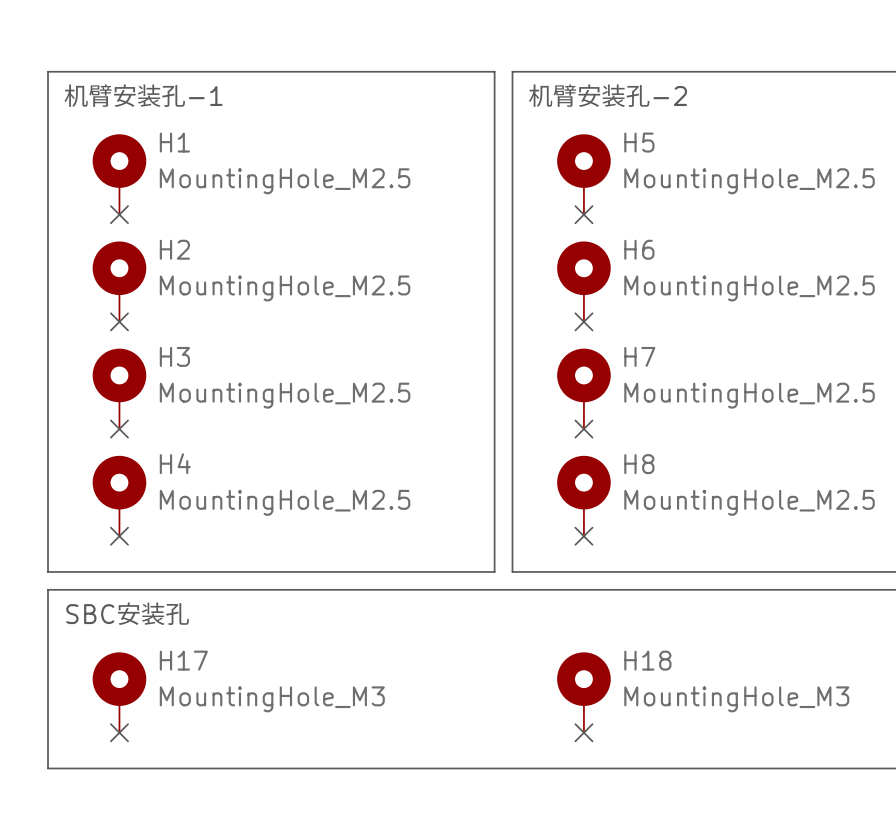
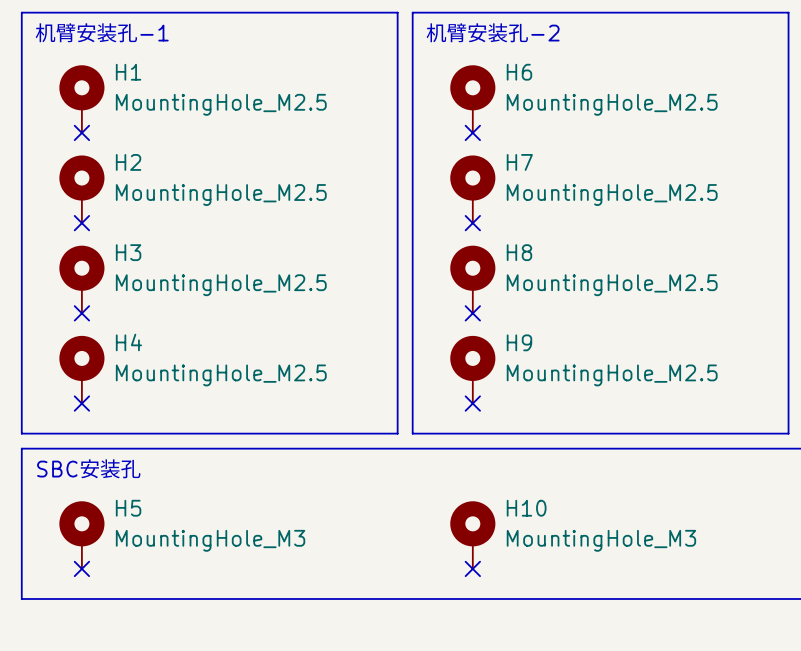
H5 name: H5 (639, 142) -> H6 (519, 72)
H6 name: H6 (639, 249) -> H7 (519, 162)
H7 name: H7 (639, 356) -> H8 (519, 252)
H8 name: H8 (639, 464) -> H9 (519, 342)
H17 name: H17 (183, 660) -> H5 (128, 508)
H18 name: H18 (647, 660) -> H10 (526, 508)

